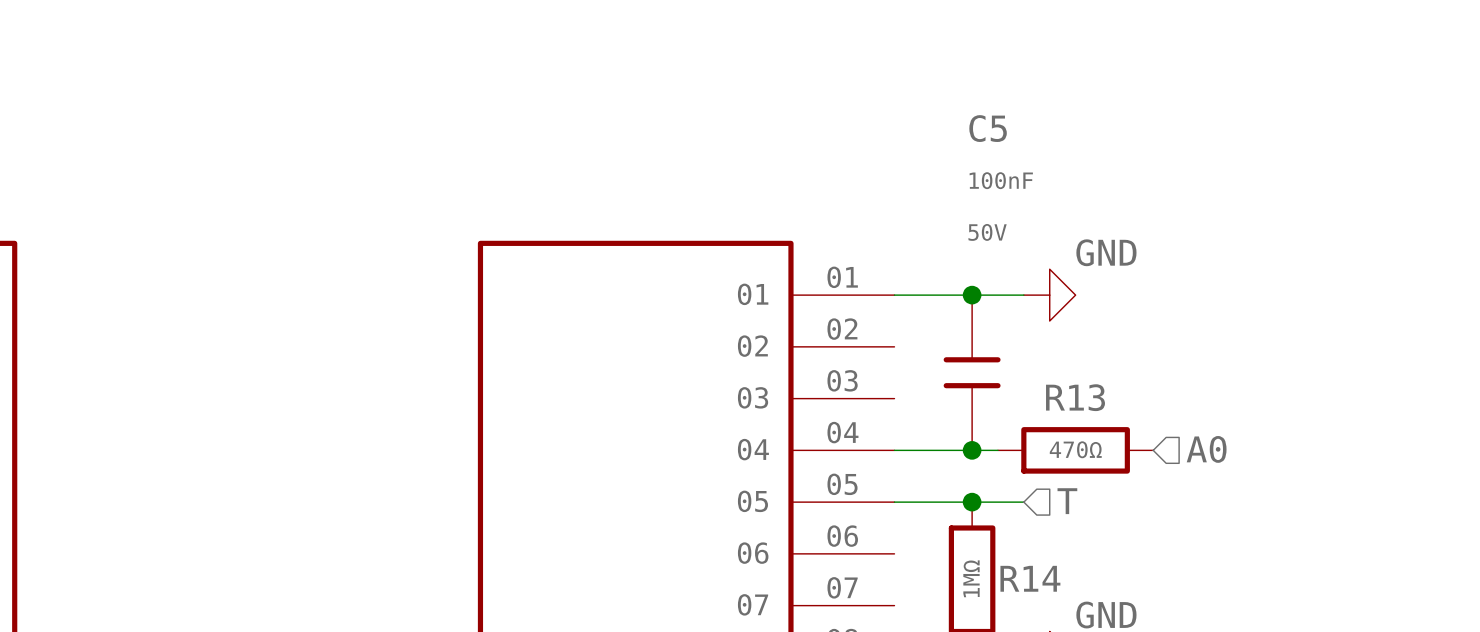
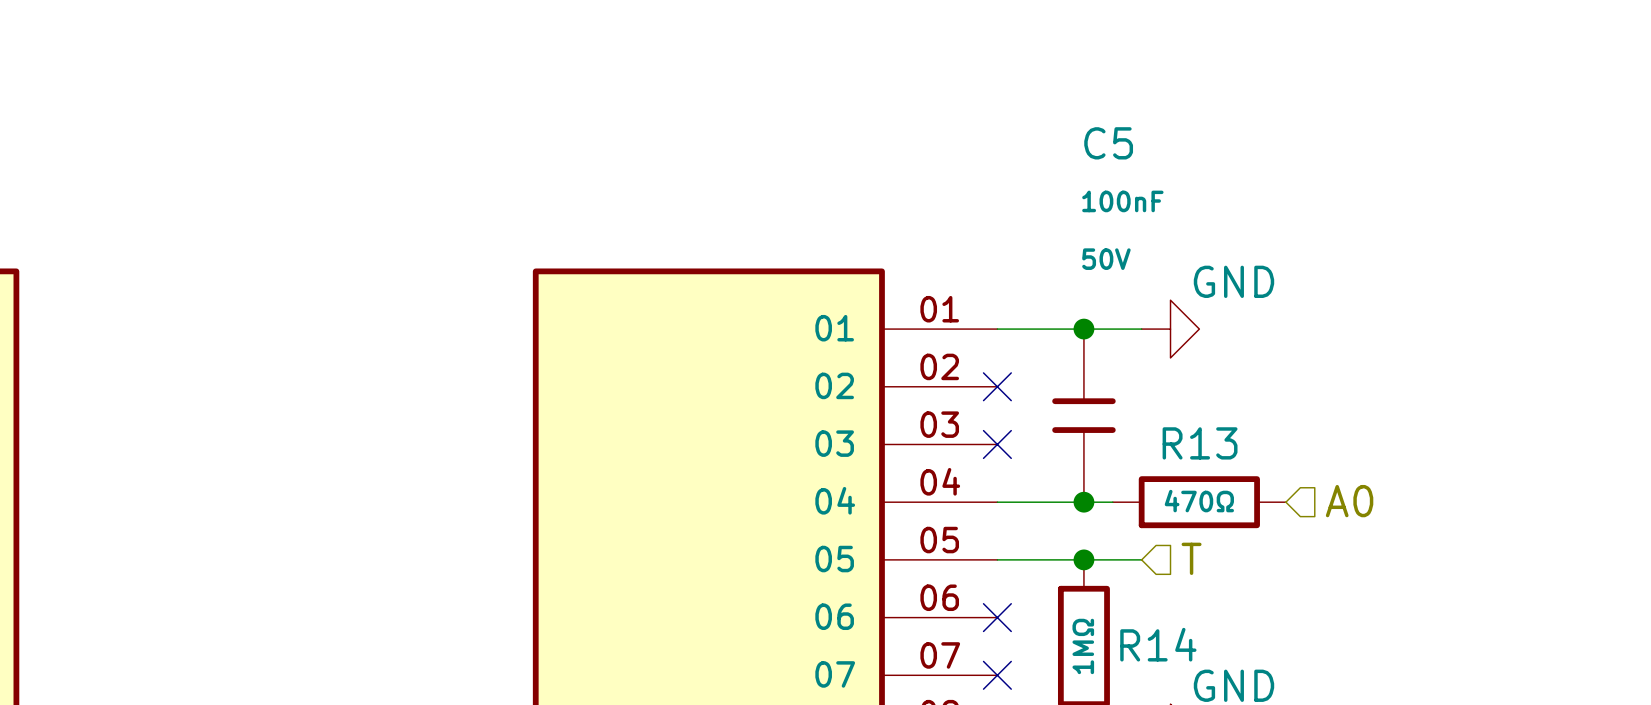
no-connect mark: none -> (997, 386)
no-connect mark: none -> (997, 444)
no-connect mark: none -> (997, 617)
no-connect mark: none -> (997, 675)

